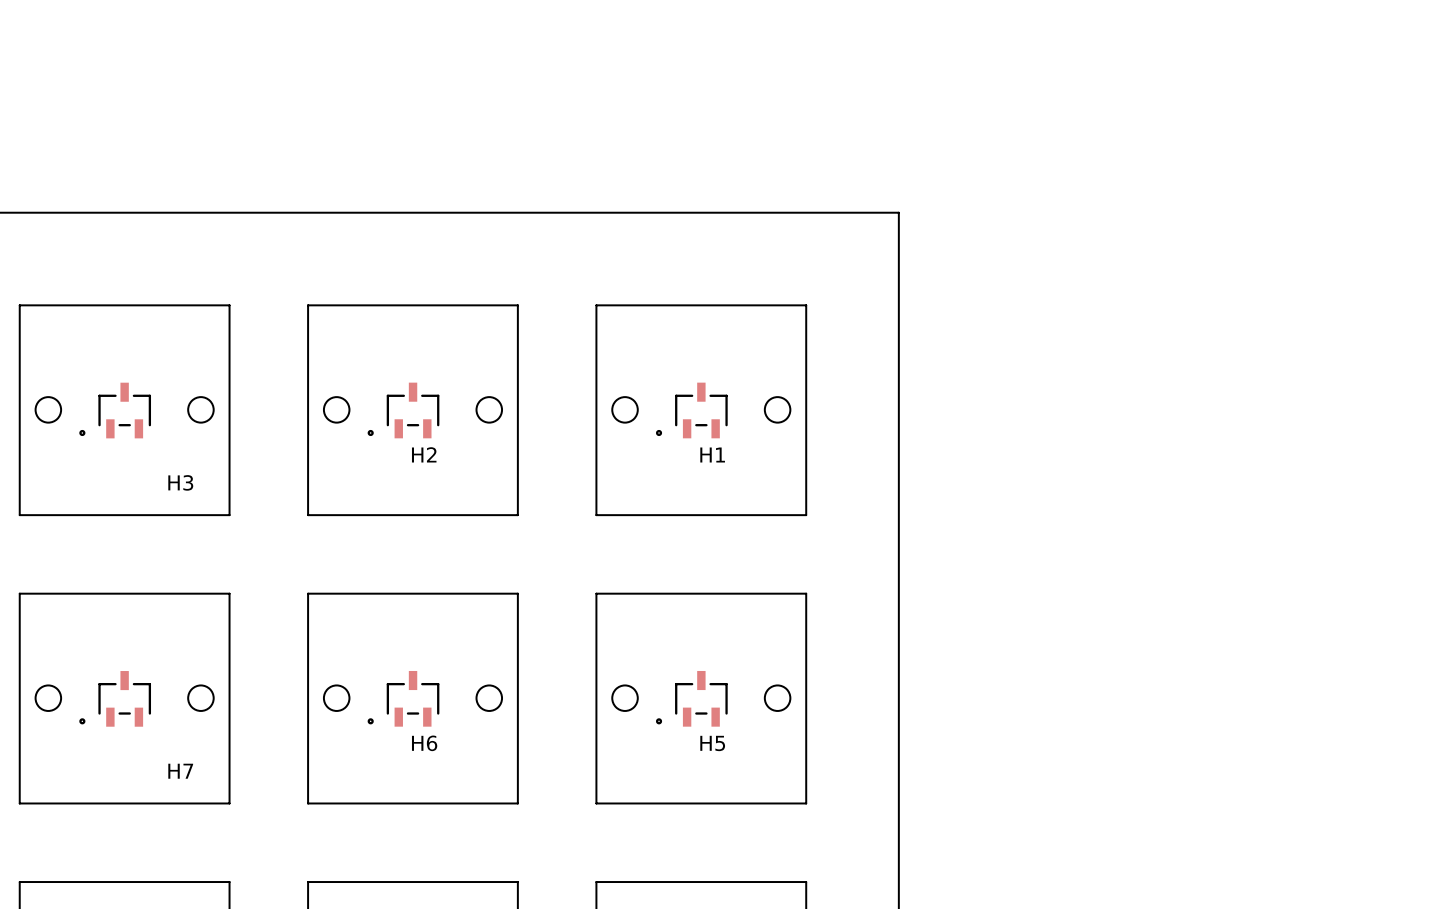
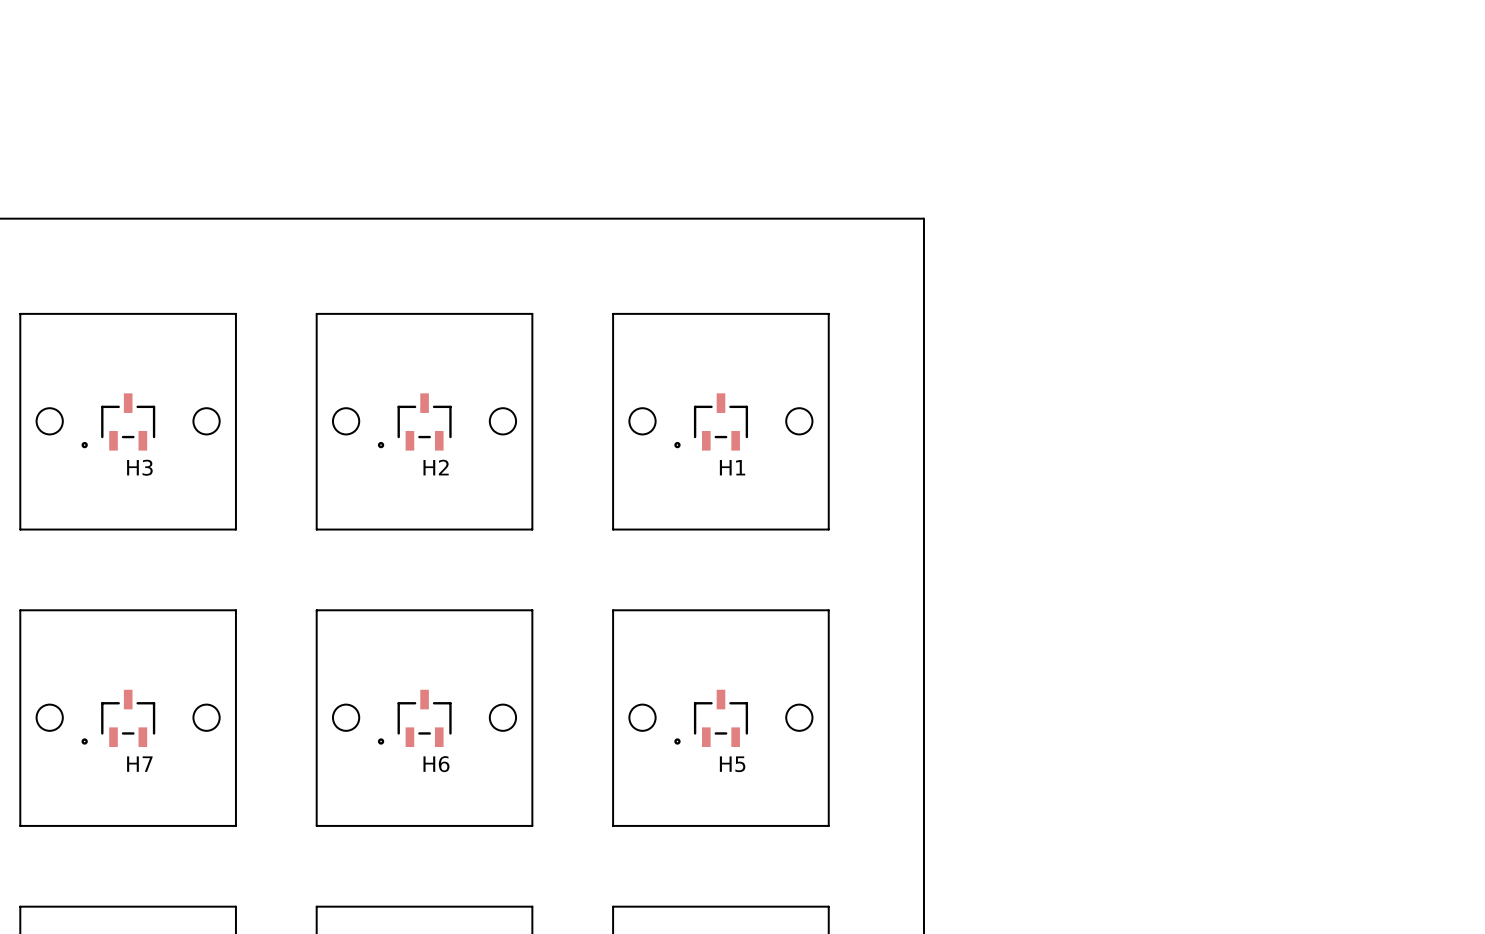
H3 name position: H3 (180, 482) -> H3 (139, 467)
H7 name position: H7 (180, 771) -> H7 (139, 764)

